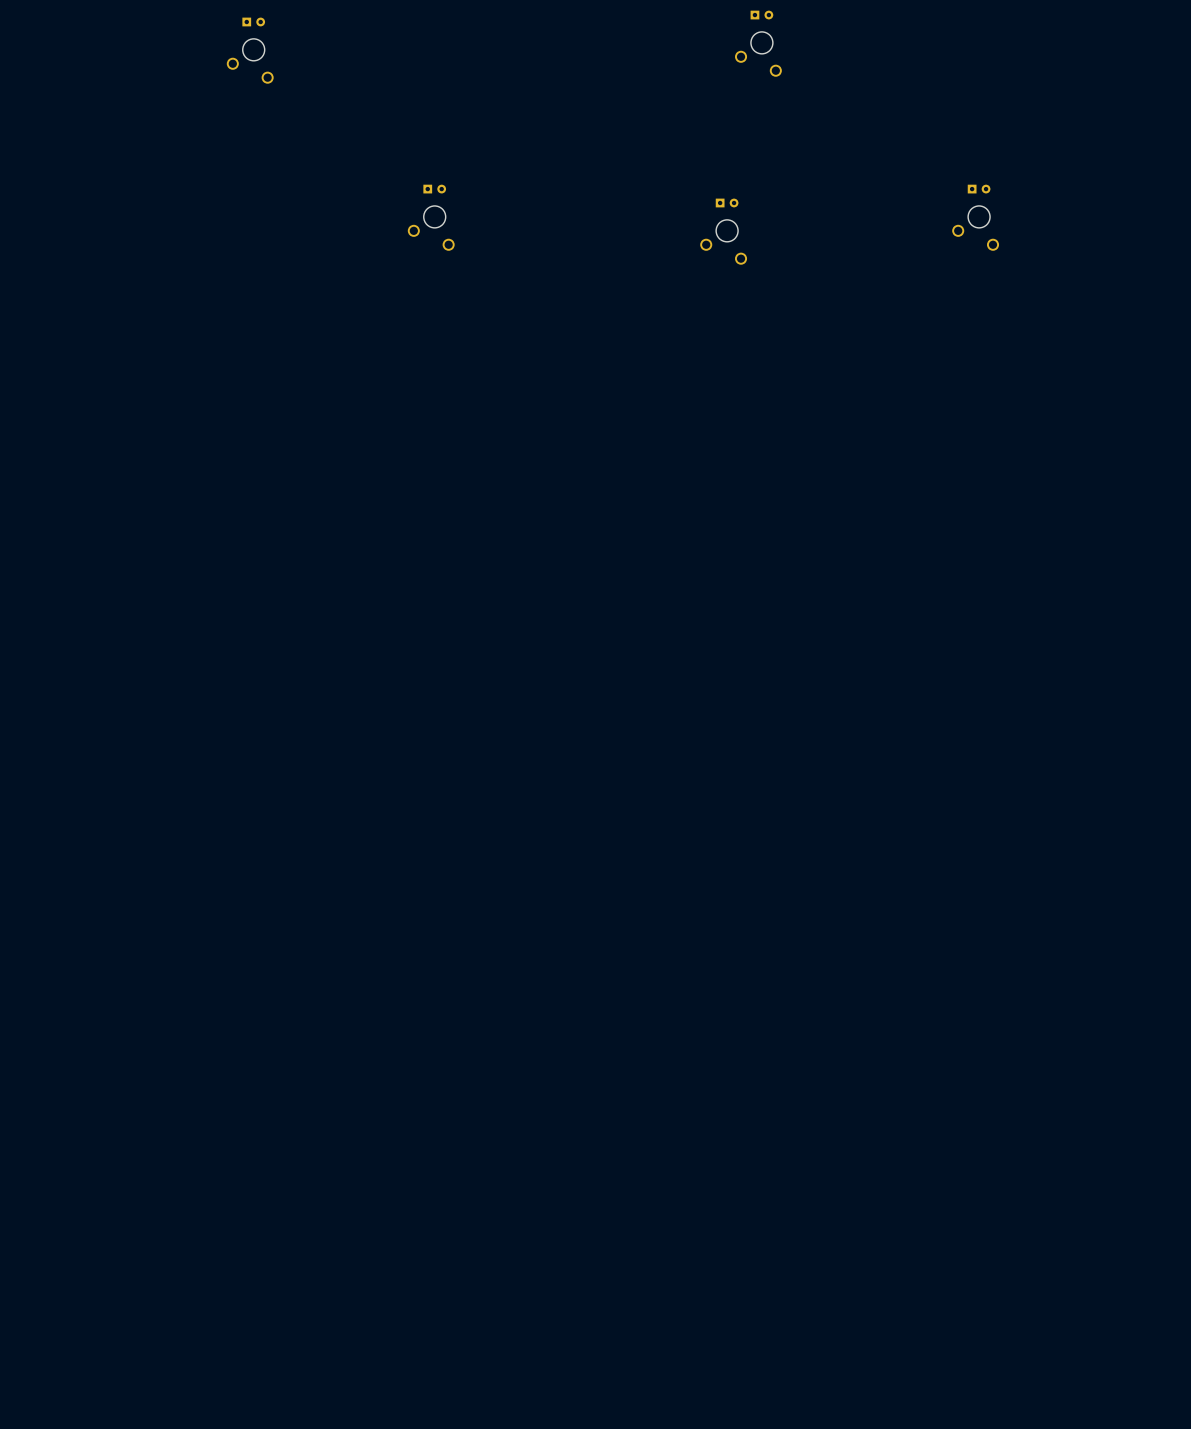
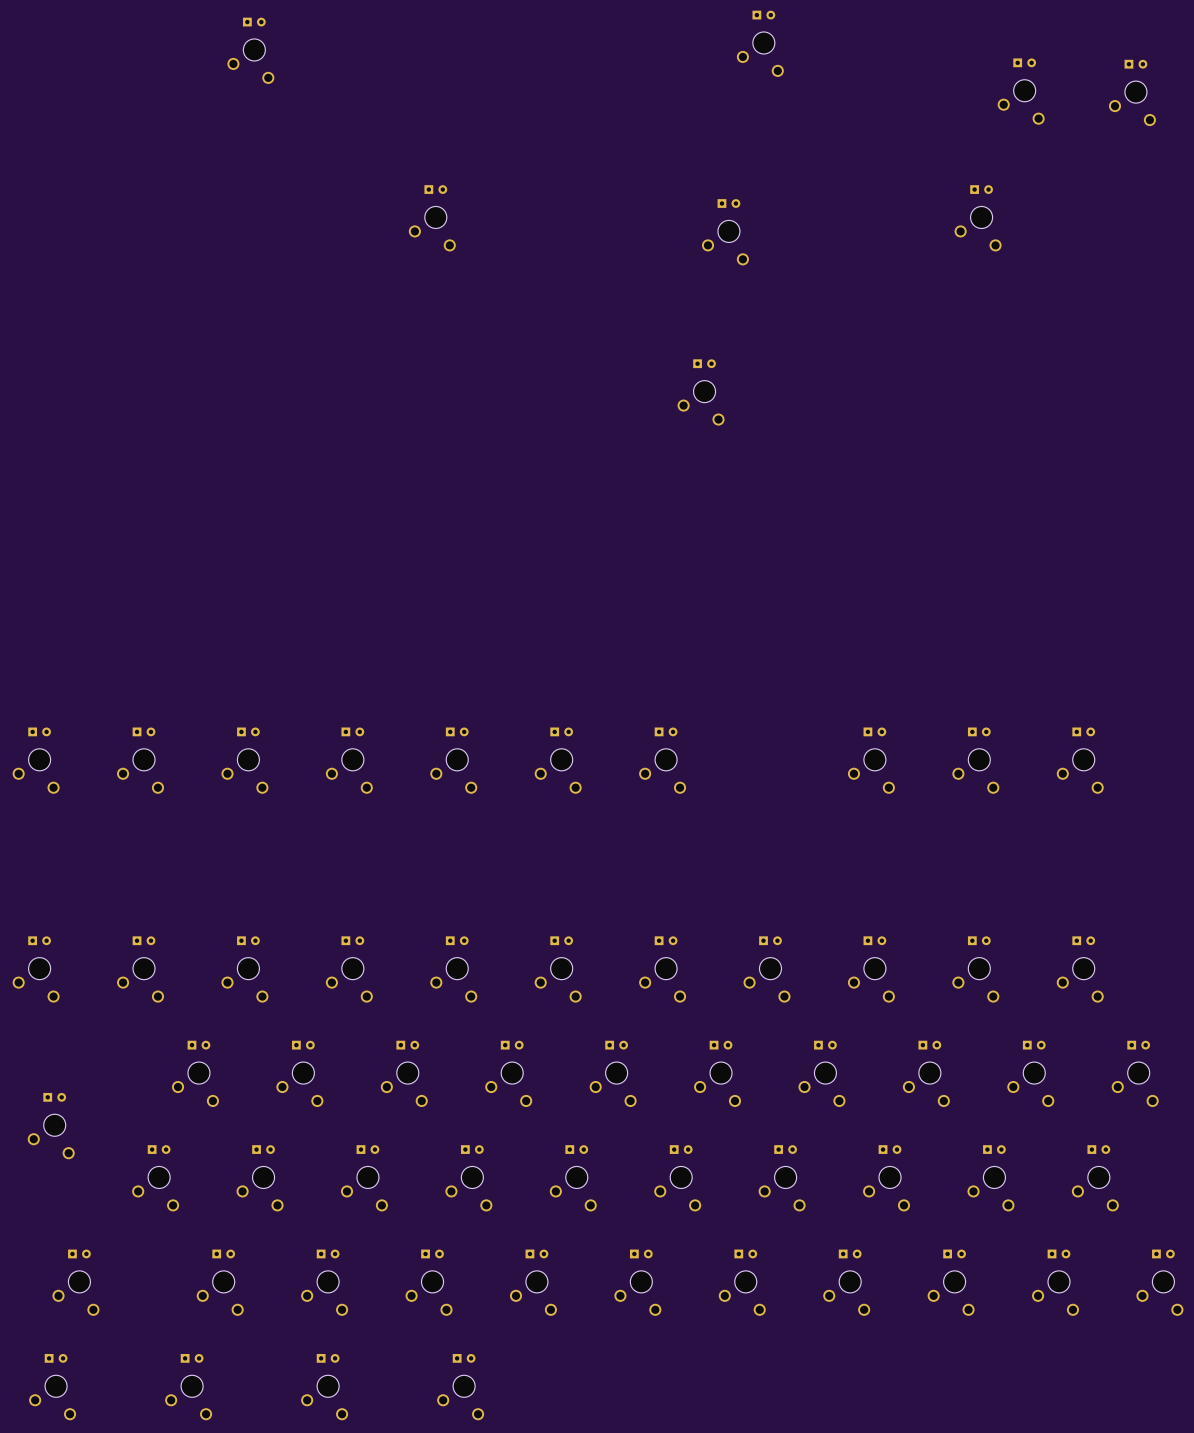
part: none -> (1021, 91)
part: none -> (1132, 92)
part: none -> (701, 392)
part: none -> (36, 760)
part: none -> (140, 760)
part: none -> (244, 760)
part: none -> (349, 760)
part: none -> (453, 760)
part: none -> (558, 760)
part: none -> (662, 760)
part: none -> (871, 760)
part: none -> (975, 760)
part: none -> (1080, 760)
part: none -> (36, 969)
part: none -> (140, 969)
part: none -> (244, 969)
part: none -> (349, 969)
part: none -> (453, 969)
part: none -> (558, 969)
part: none -> (662, 969)
part: none -> (767, 969)
part: none -> (871, 969)
part: none -> (975, 969)
part: none -> (1080, 969)
part: none -> (195, 1073)
part: none -> (299, 1073)
part: none -> (404, 1073)
part: none -> (508, 1073)
part: none -> (613, 1073)
part: none -> (717, 1073)
part: none -> (821, 1073)
part: none -> (926, 1073)
part: none -> (1030, 1073)
part: none -> (1135, 1073)
part: none -> (51, 1126)
part: none -> (155, 1178)
part: none -> (260, 1178)
part: none -> (364, 1178)
part: none -> (468, 1178)
part: none -> (573, 1178)
part: none -> (677, 1178)
part: none -> (782, 1178)
part: none -> (886, 1178)
part: none -> (990, 1178)
part: none -> (1095, 1178)
part: none -> (75, 1282)
part: none -> (220, 1282)
part: none -> (324, 1282)
part: none -> (429, 1282)
part: none -> (533, 1282)
part: none -> (637, 1282)
part: none -> (742, 1282)
part: none -> (846, 1282)
part: none -> (951, 1282)
part: none -> (1055, 1282)
part: none -> (1159, 1282)
part: none -> (52, 1387)
part: none -> (188, 1387)
part: none -> (324, 1387)
part: none -> (460, 1387)

